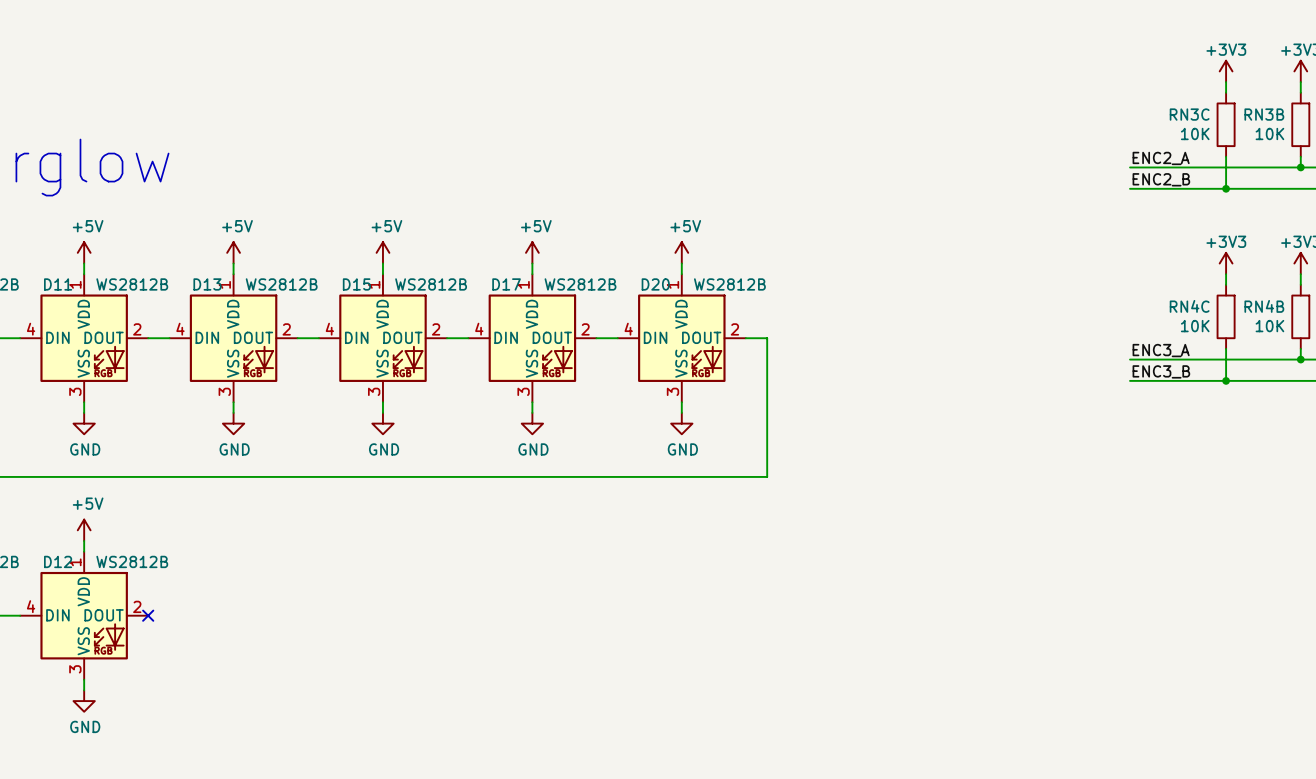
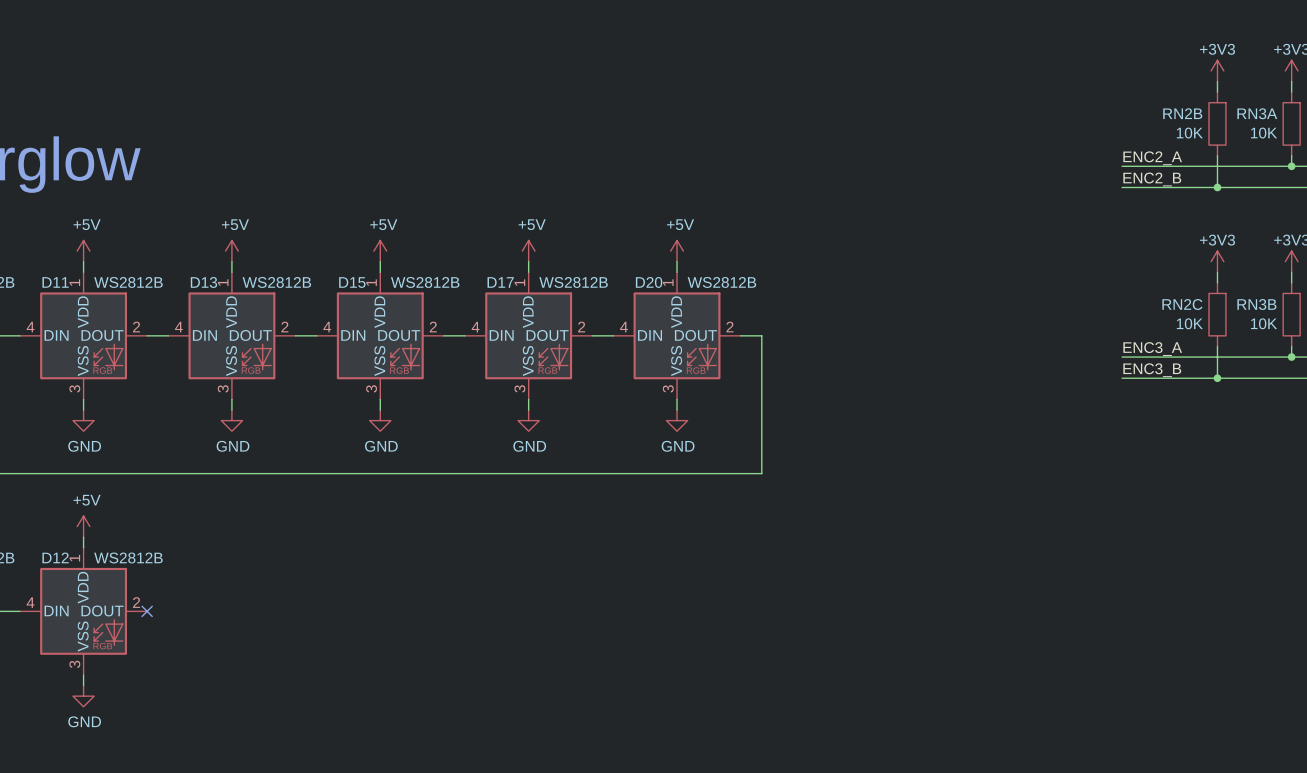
RN3C name: RN3C (1189, 114) -> RN2B (1182, 113)
RN3B name: RN3B (1264, 114) -> RN3A (1257, 113)
RN4C name: RN4C (1189, 306) -> RN2C (1182, 304)
RN4B name: RN4B (1264, 306) -> RN3B (1256, 304)

